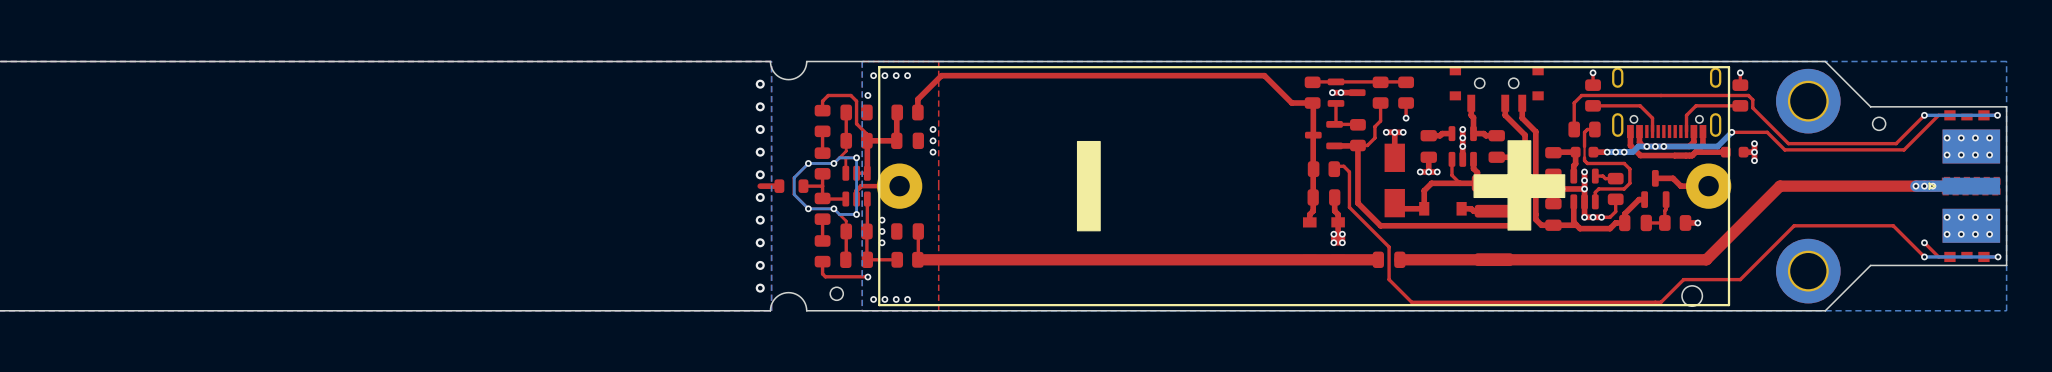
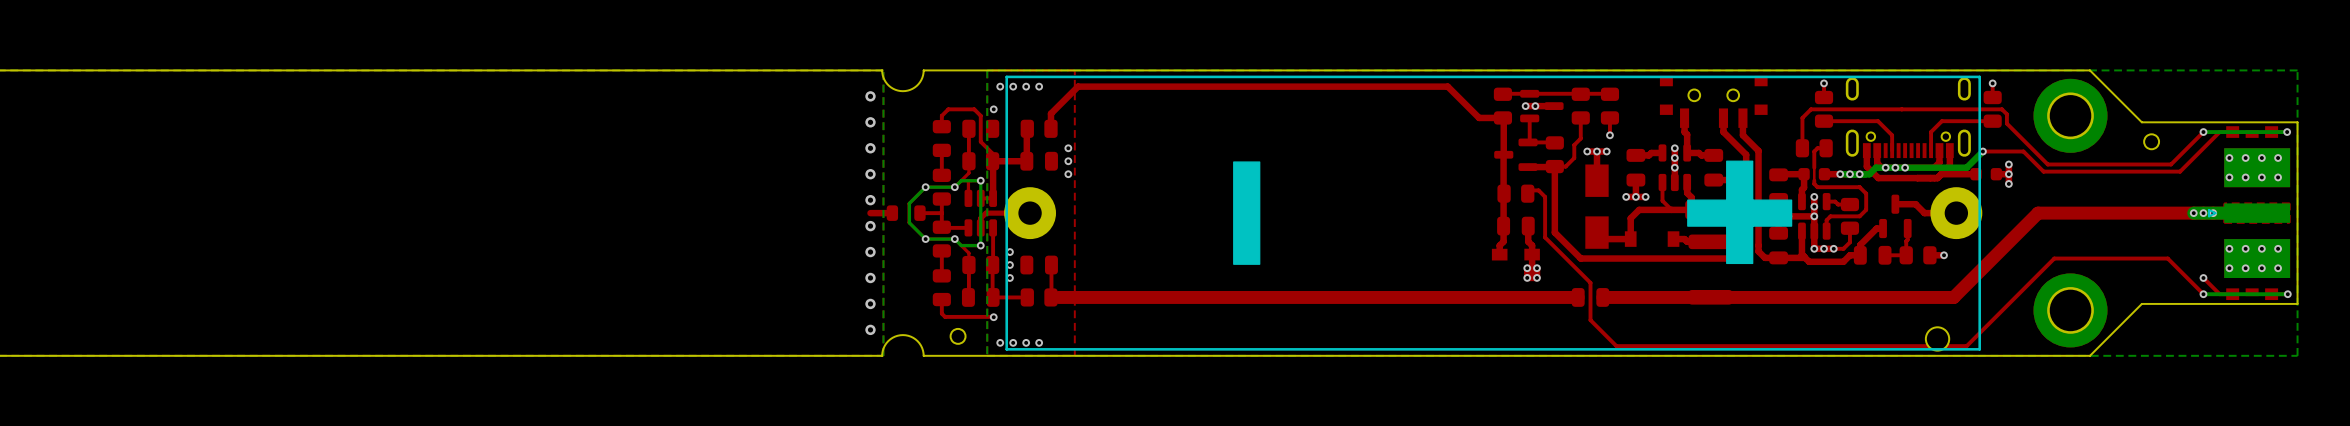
top track: (1740, 279) (1683, 279) (1661, 302) -> (1992, 320) (1966, 346) (1901, 346)

